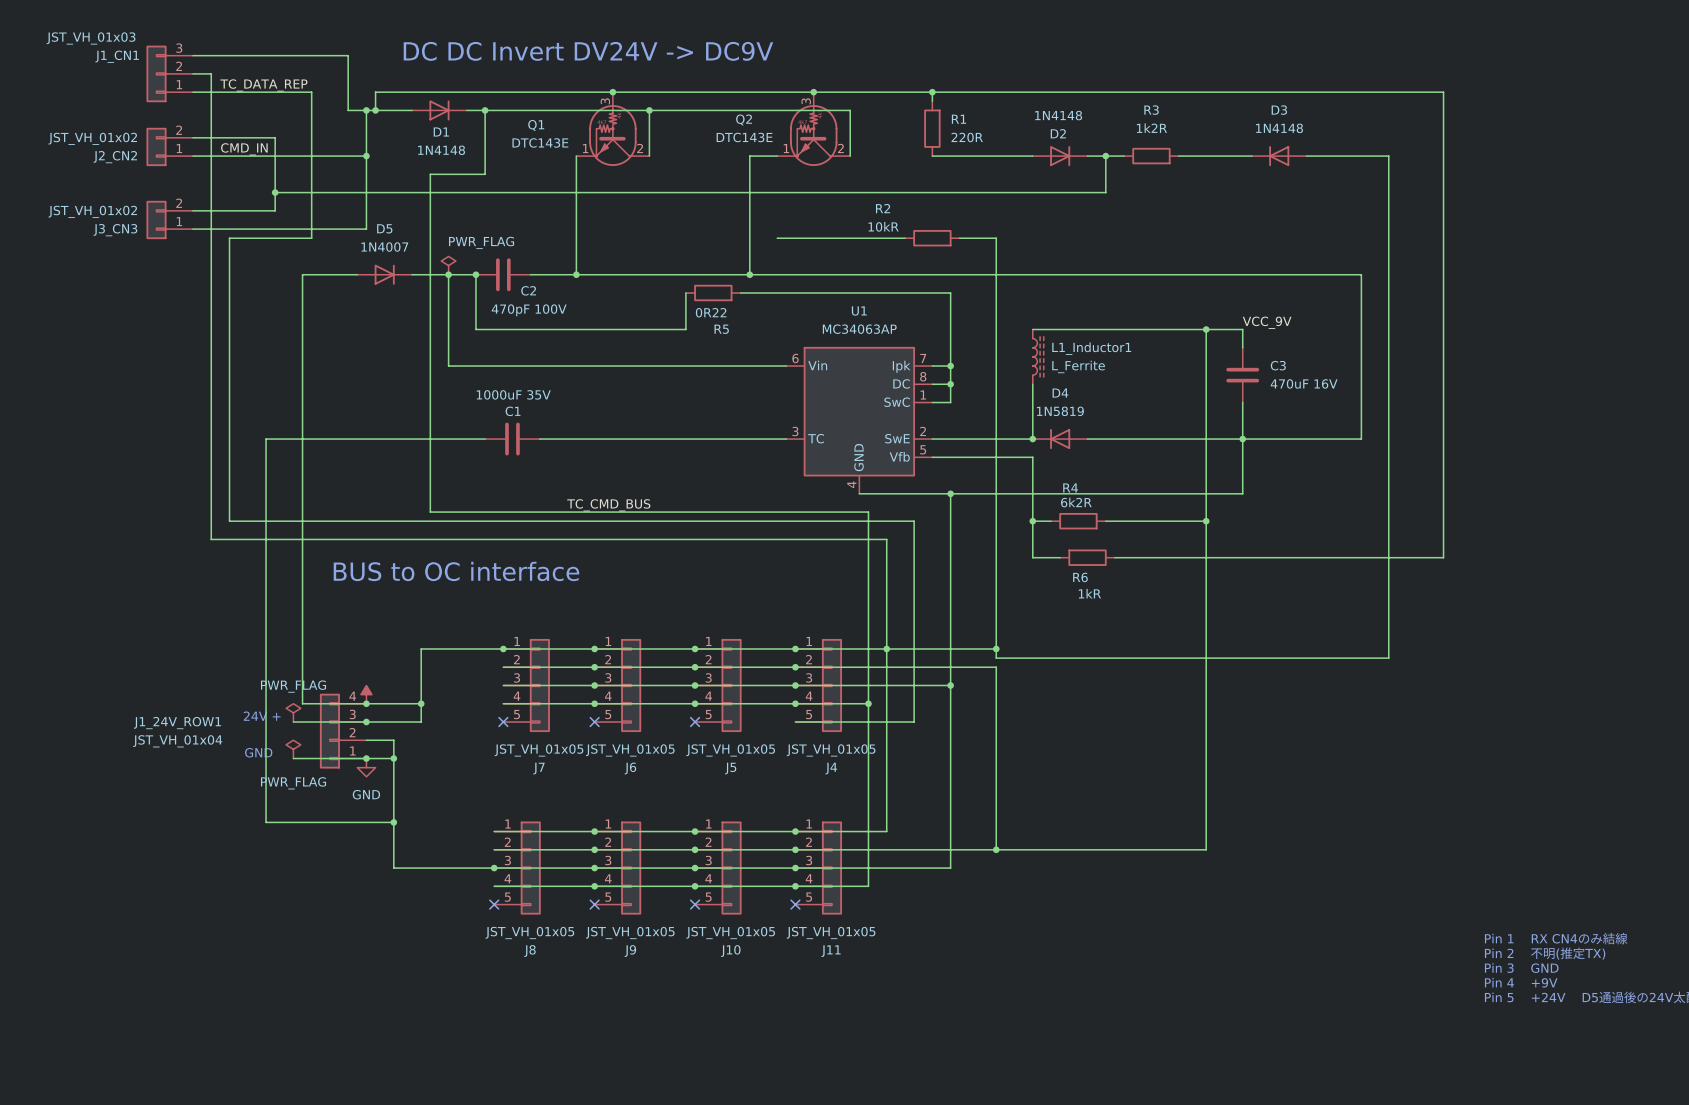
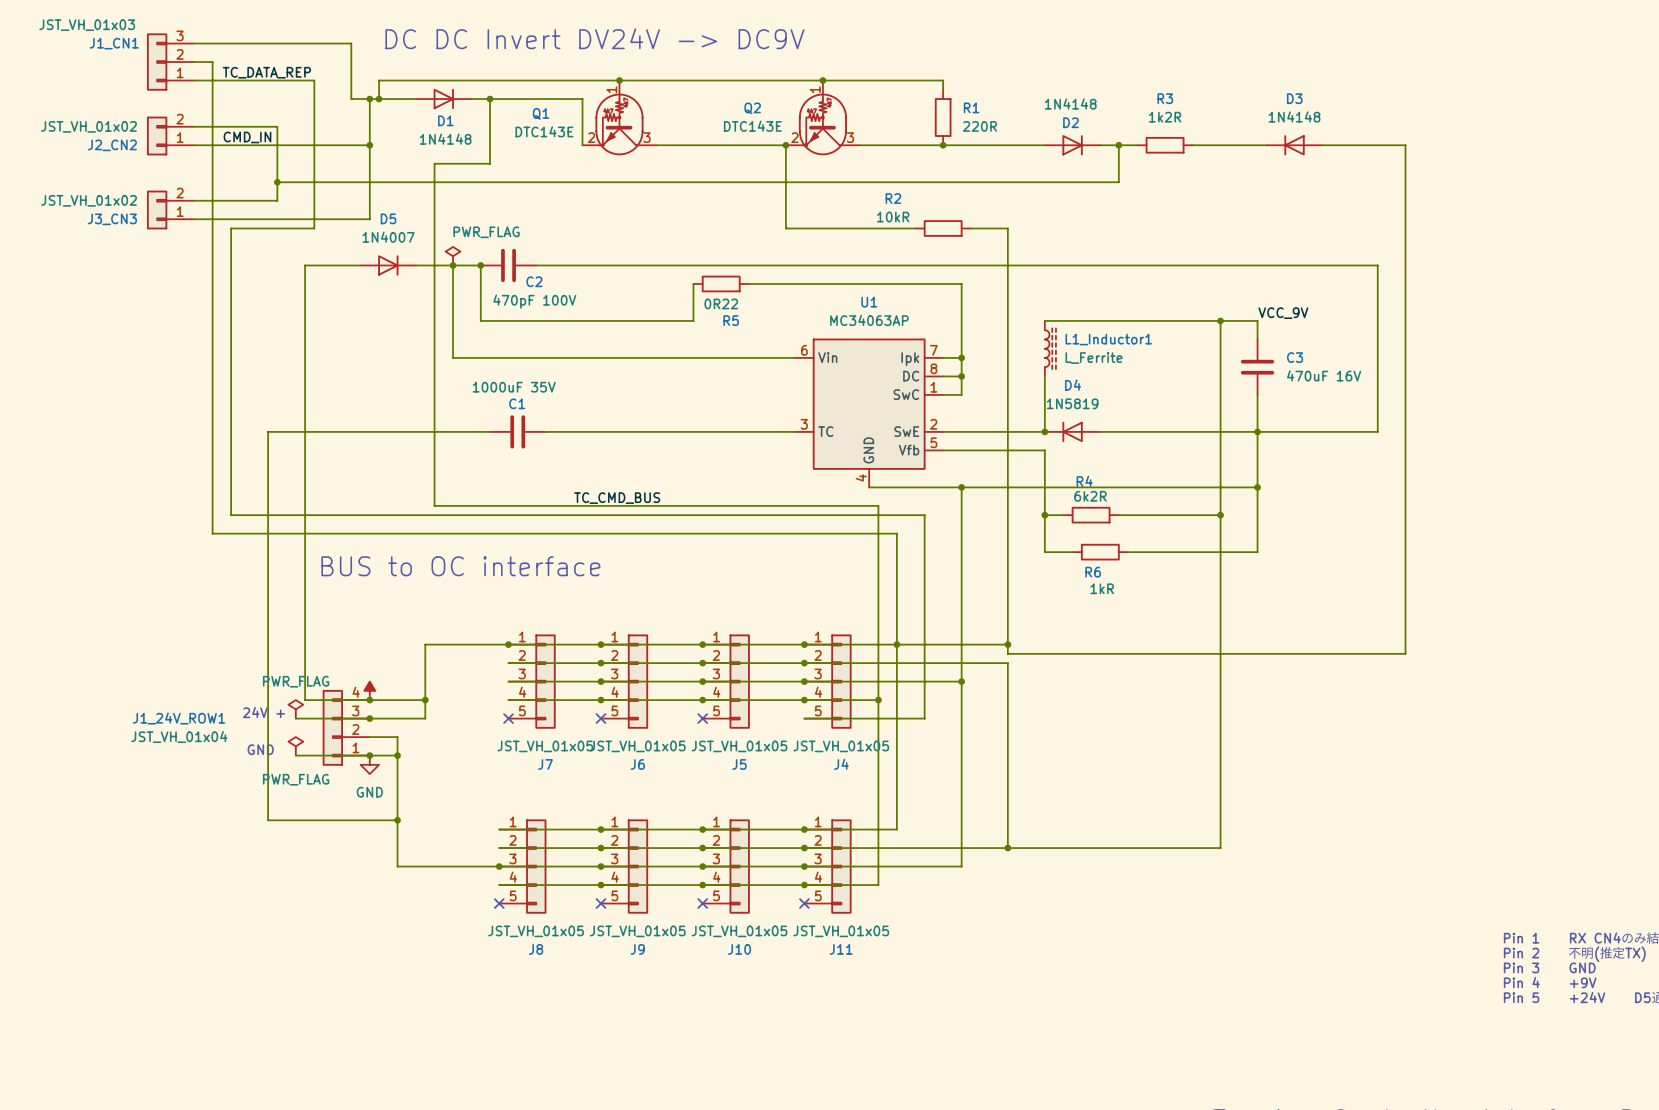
wire: (932, 92) (1443, 92) (1443, 557) (1242, 557) -> (1257, 487) (1257, 552)
junction: (932, 92) -> none
Q1 pin number: 3 (605, 101) -> 1 (611, 89)
Q2 pin number: 3 (806, 101) -> 1 (815, 89)
wire: (576, 110) (850, 110) (850, 156) -> (943, 145) (859, 145)
wire: (649, 110) (649, 156) -> (758, 145) (656, 145)
junction: (649, 110) -> none
Q1 pin number: 1 (585, 148) -> 2 (591, 137)
Q1 pin number: 2 (640, 148) -> 3 (647, 137)
Q2 pin number: 1 (786, 148) -> 2 (794, 137)
Q2 pin number: 2 (840, 148) -> 3 (850, 137)
wire: (576, 156) (576, 274) -> (582, 145) (582, 99)
wire: (749, 156) (749, 274) -> none
wire: none -> (785, 145) (785, 228)
junction: none -> (785, 145)
junction: none -> (943, 145)
junction: (576, 274) -> none
junction: (749, 274) -> none
junction: none -> (1257, 487)

